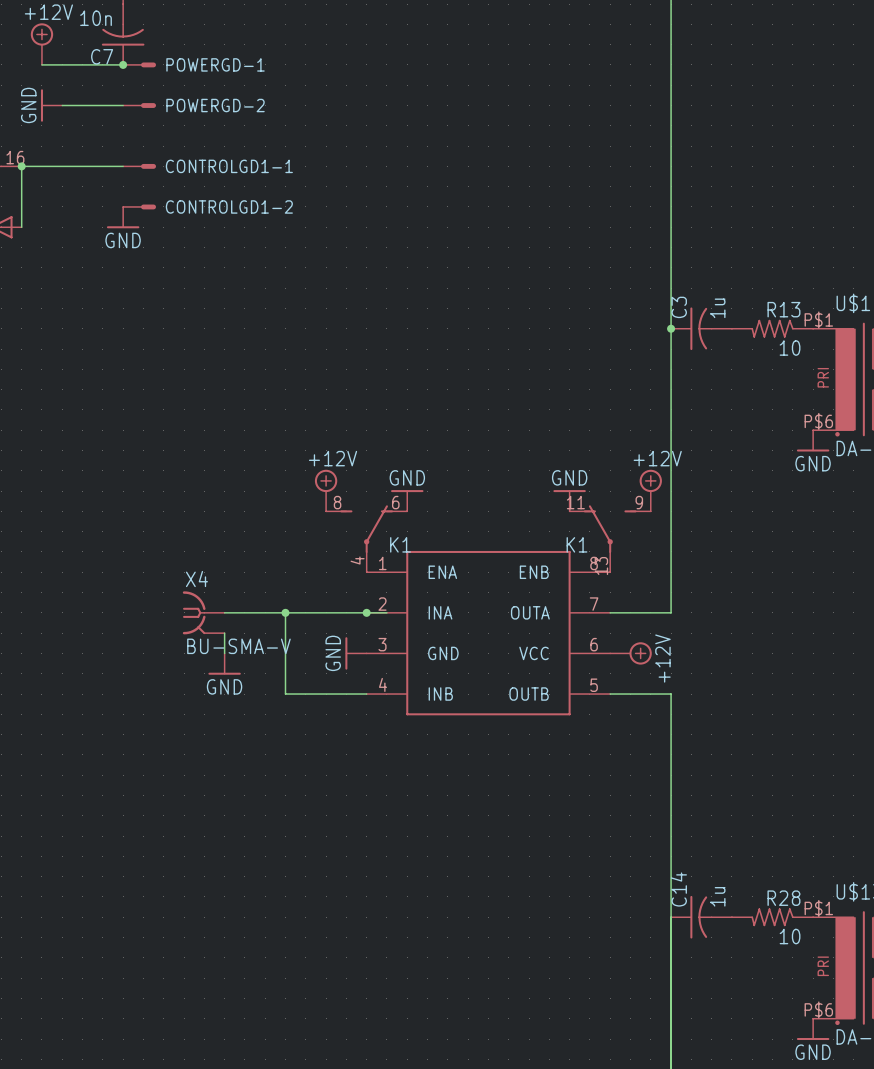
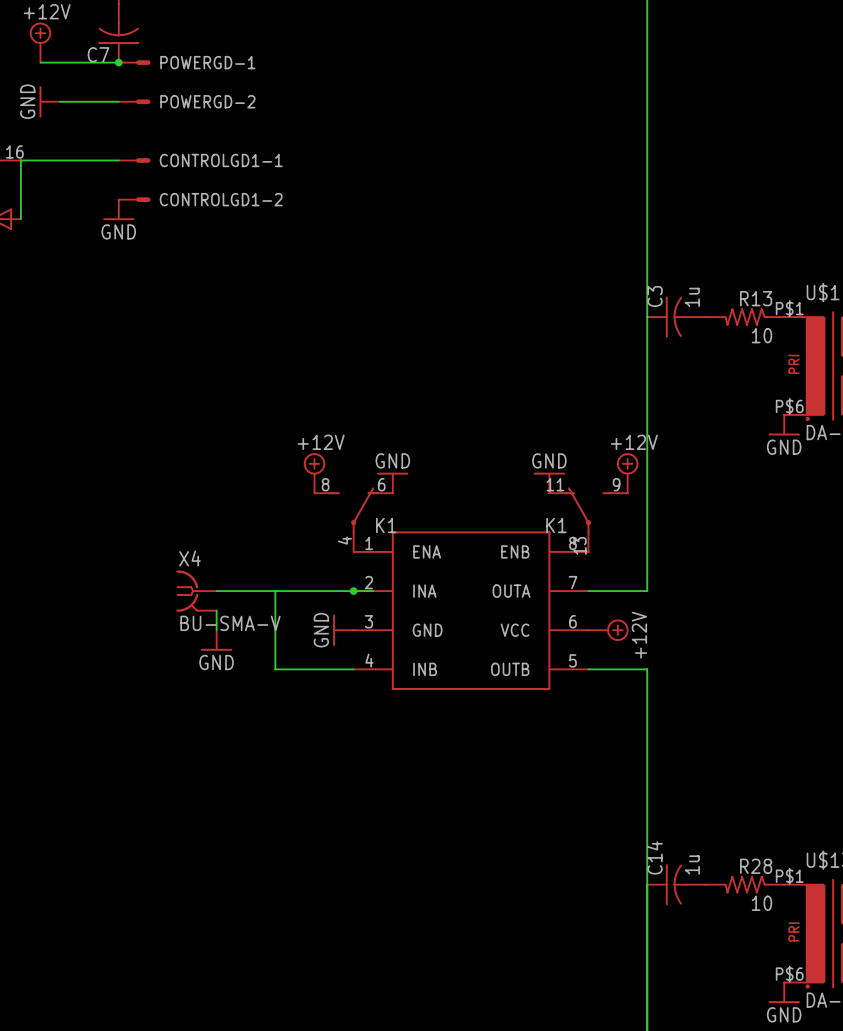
C7 value: 10n (96, 18) -> none
junction: (21, 166) -> none
junction: (671, 328) -> none
junction: (285, 612) -> none

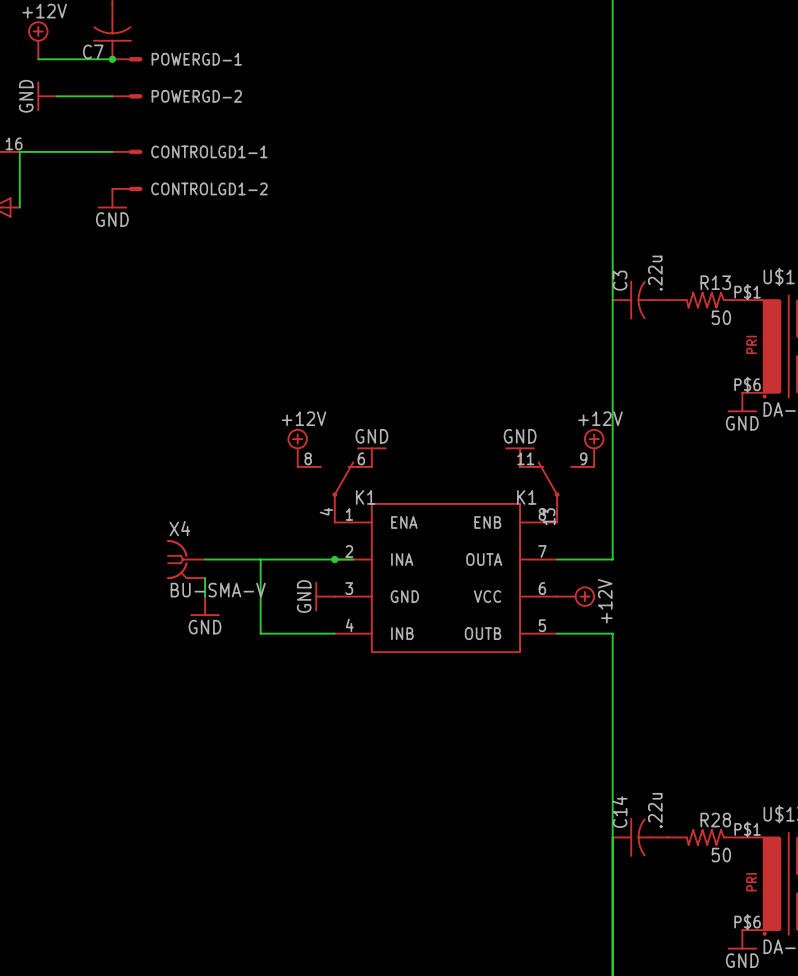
C3 value: 1u (692, 297) -> .22u (655, 273)
R13 value: 10 (761, 335) -> 50 (721, 317)
C14 value: 1u (692, 864) -> .22u (655, 810)
R28 value: 10 (761, 903) -> 50 (721, 855)

